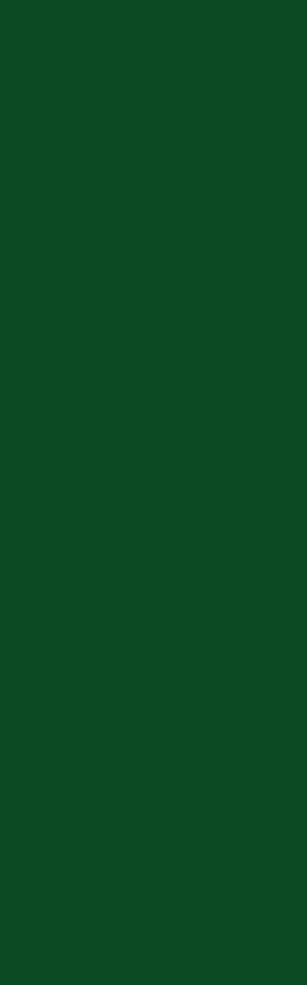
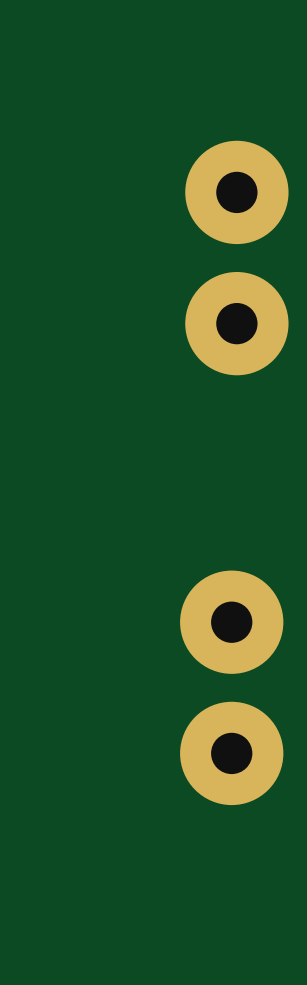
part: none -> (236, 258)
part: none -> (231, 687)

